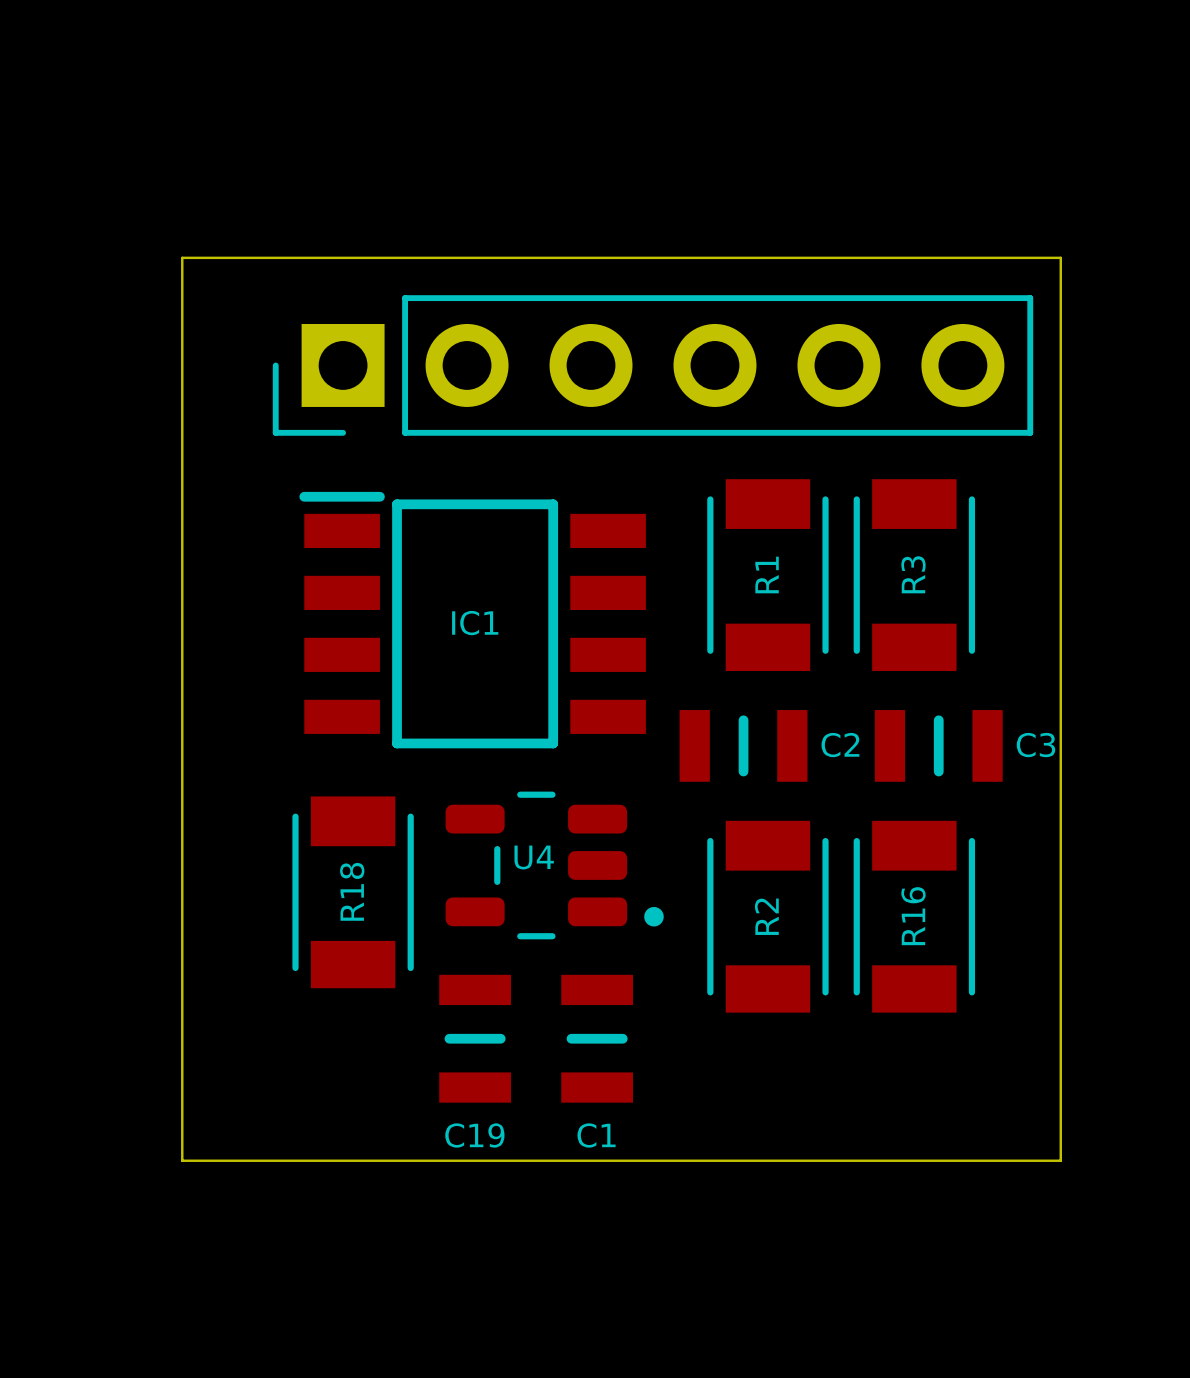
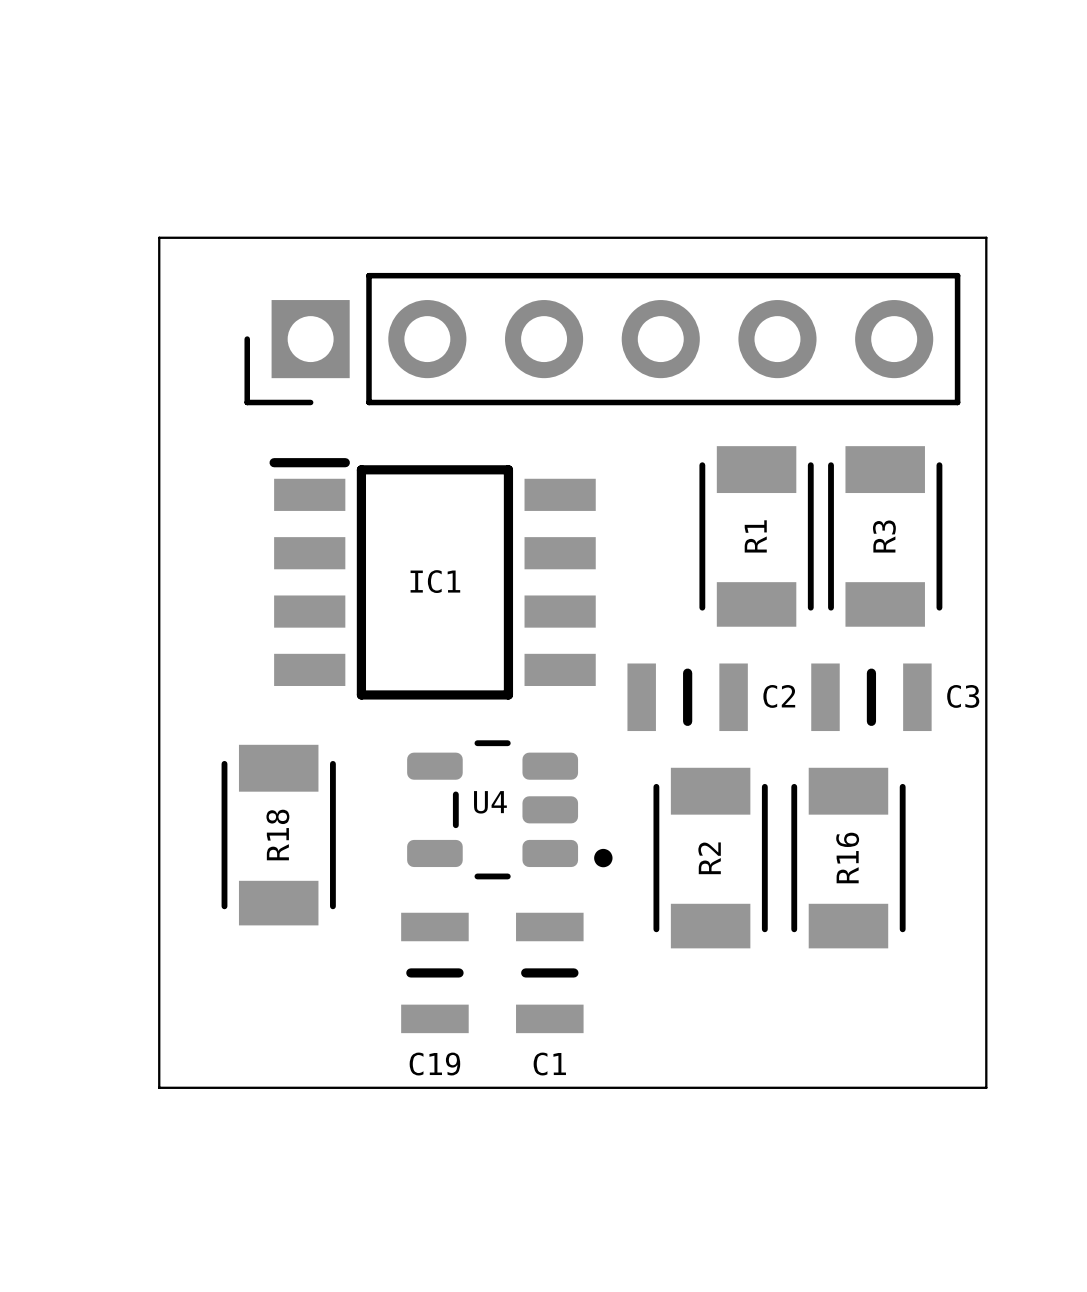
R1 position: (767, 575) -> (756, 536)
R3 position: (914, 575) -> (885, 536)
R18 position: (353, 892) -> (278, 835)

